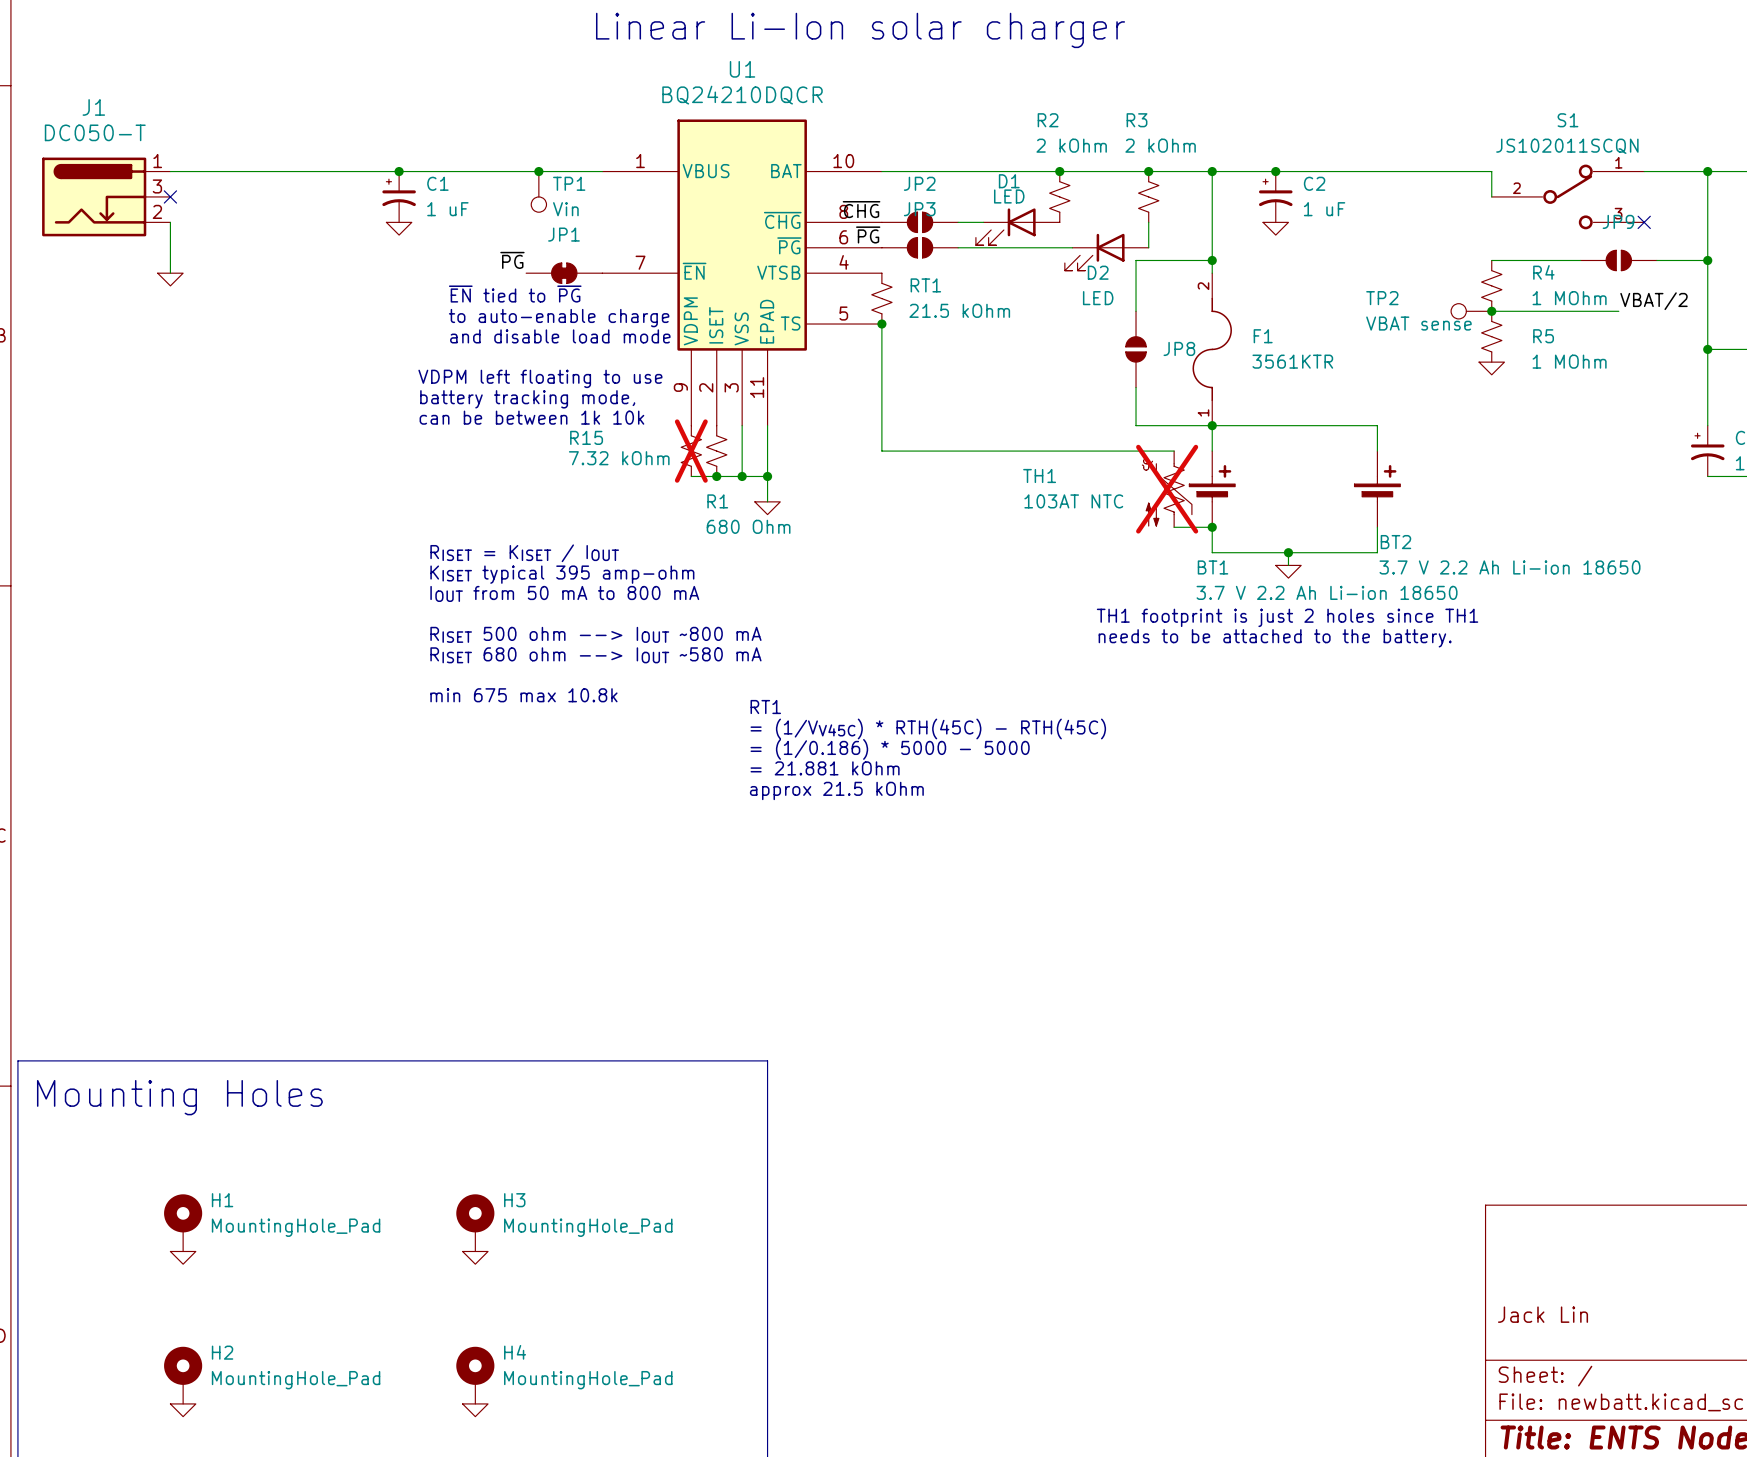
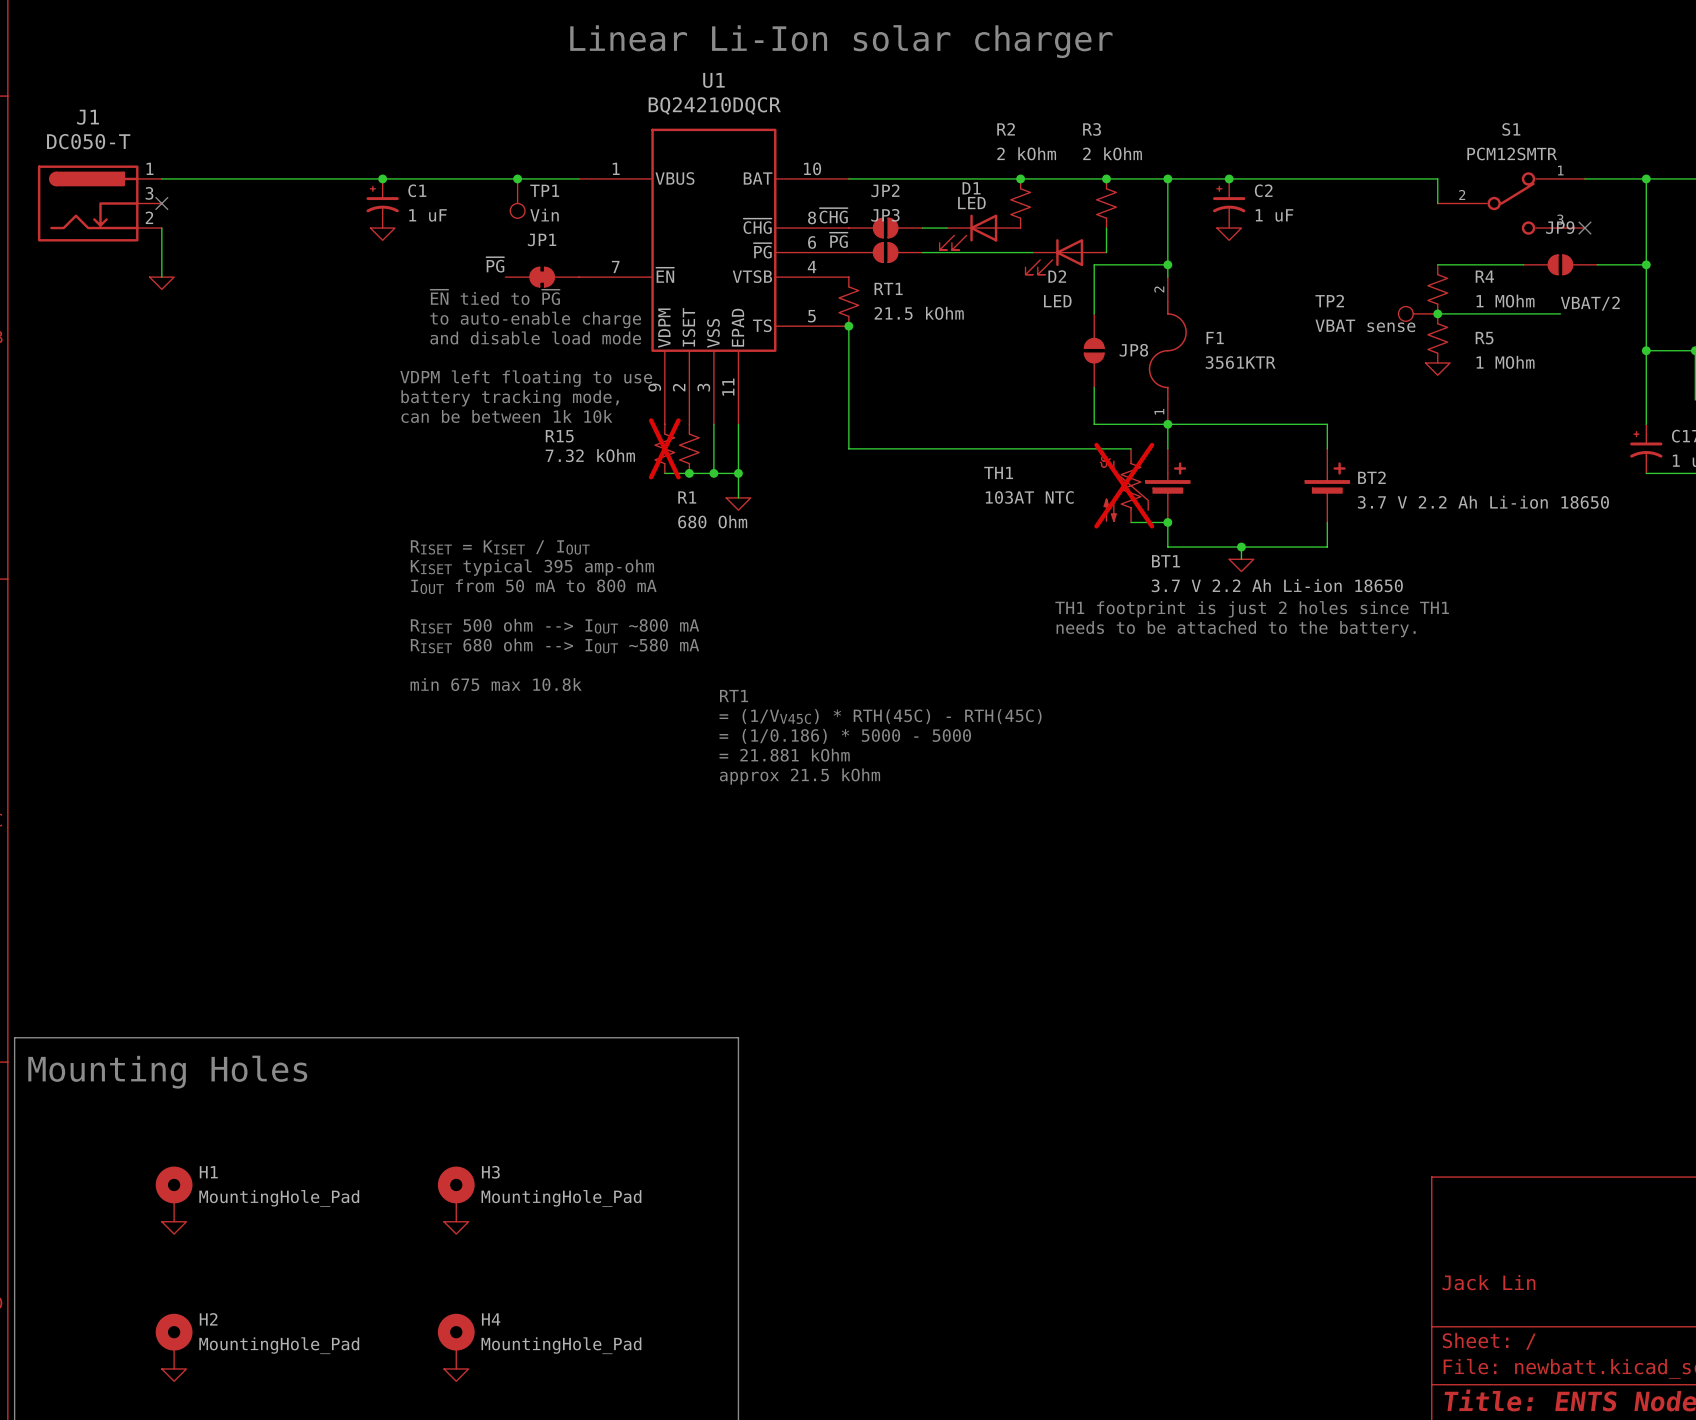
S1 value: JS102011SCQN (1567, 146) -> PCM12SMTR (1512, 153)
BT2 name position: BT2 (1395, 542) -> BT2 (1371, 477)
BT2 value position: 3.7 V 2.2 Ah Li-ion 18650 (1510, 567) -> 3.7 V 2.2 Ah Li-ion 18650 (1483, 502)

